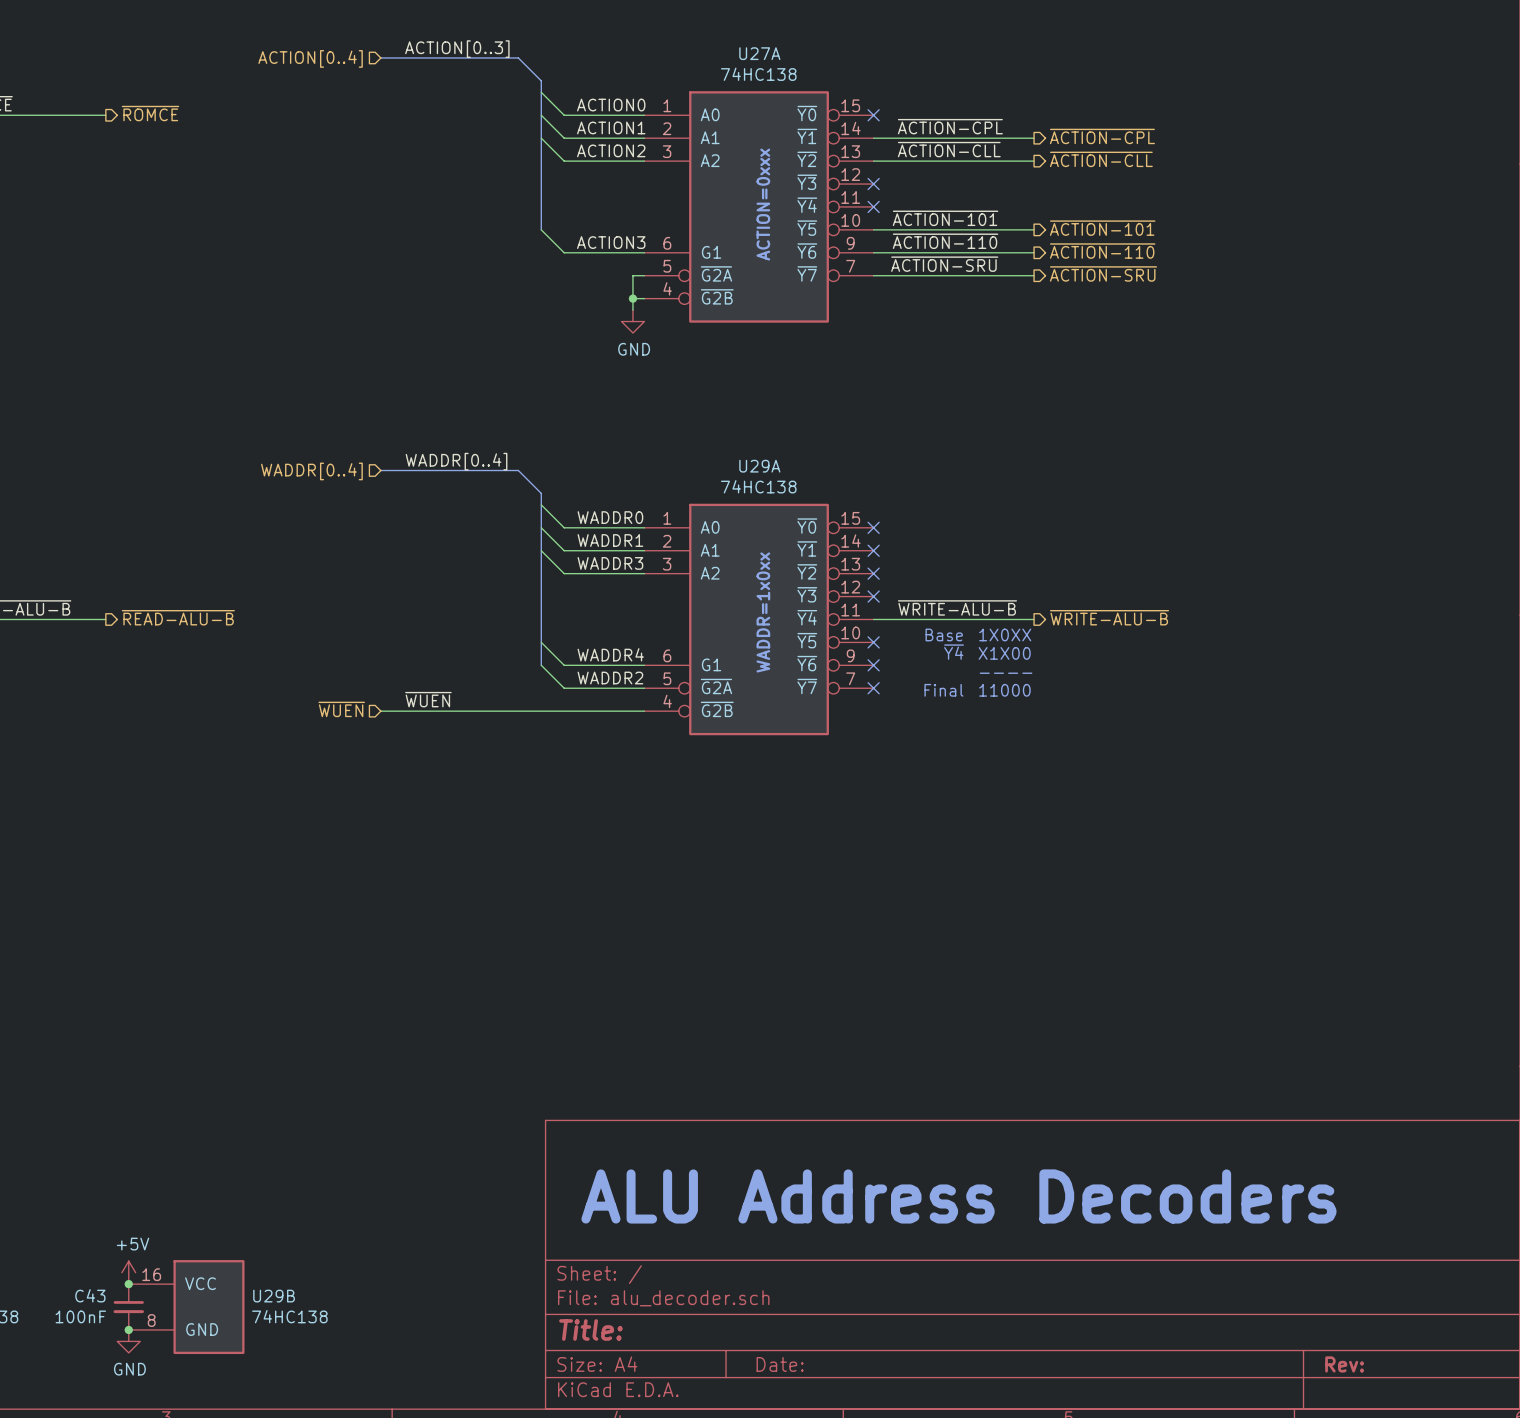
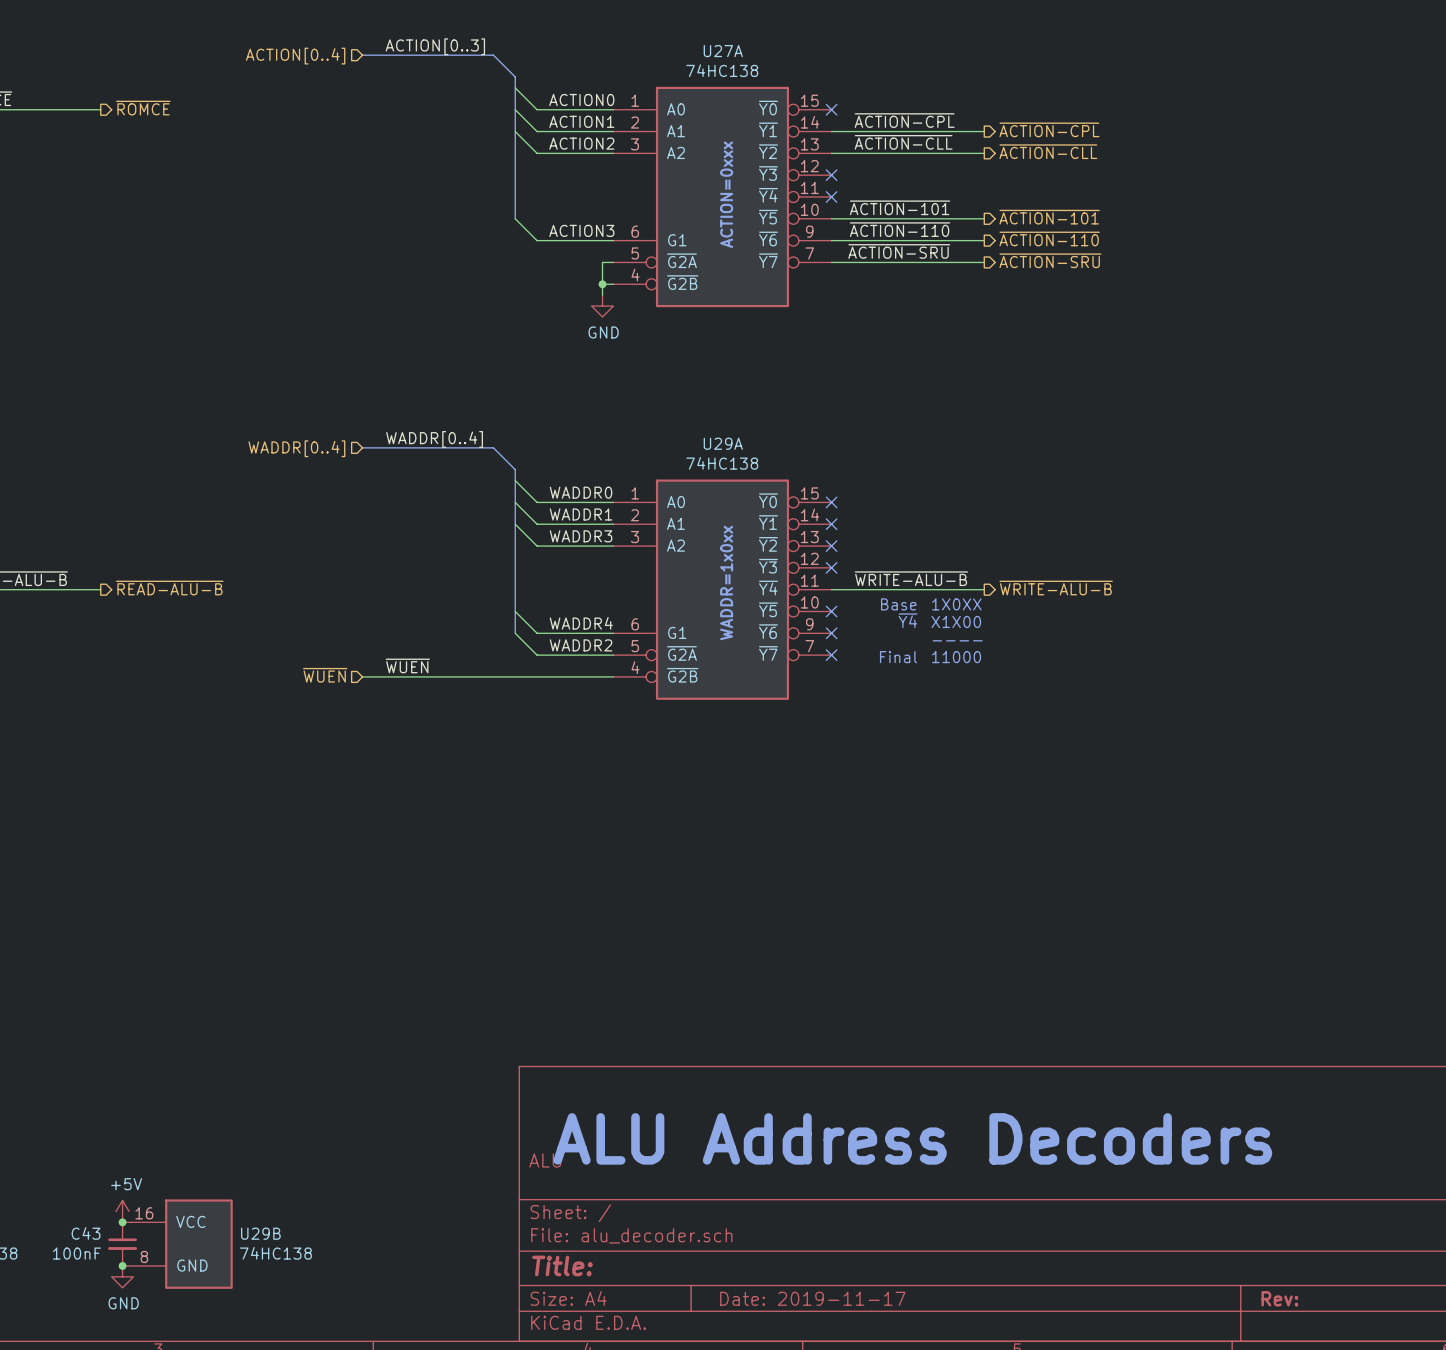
title block: none -> ALU (545, 1160)
title block: Date: (780, 1364) -> Date: 2019-11-17 (812, 1298)

